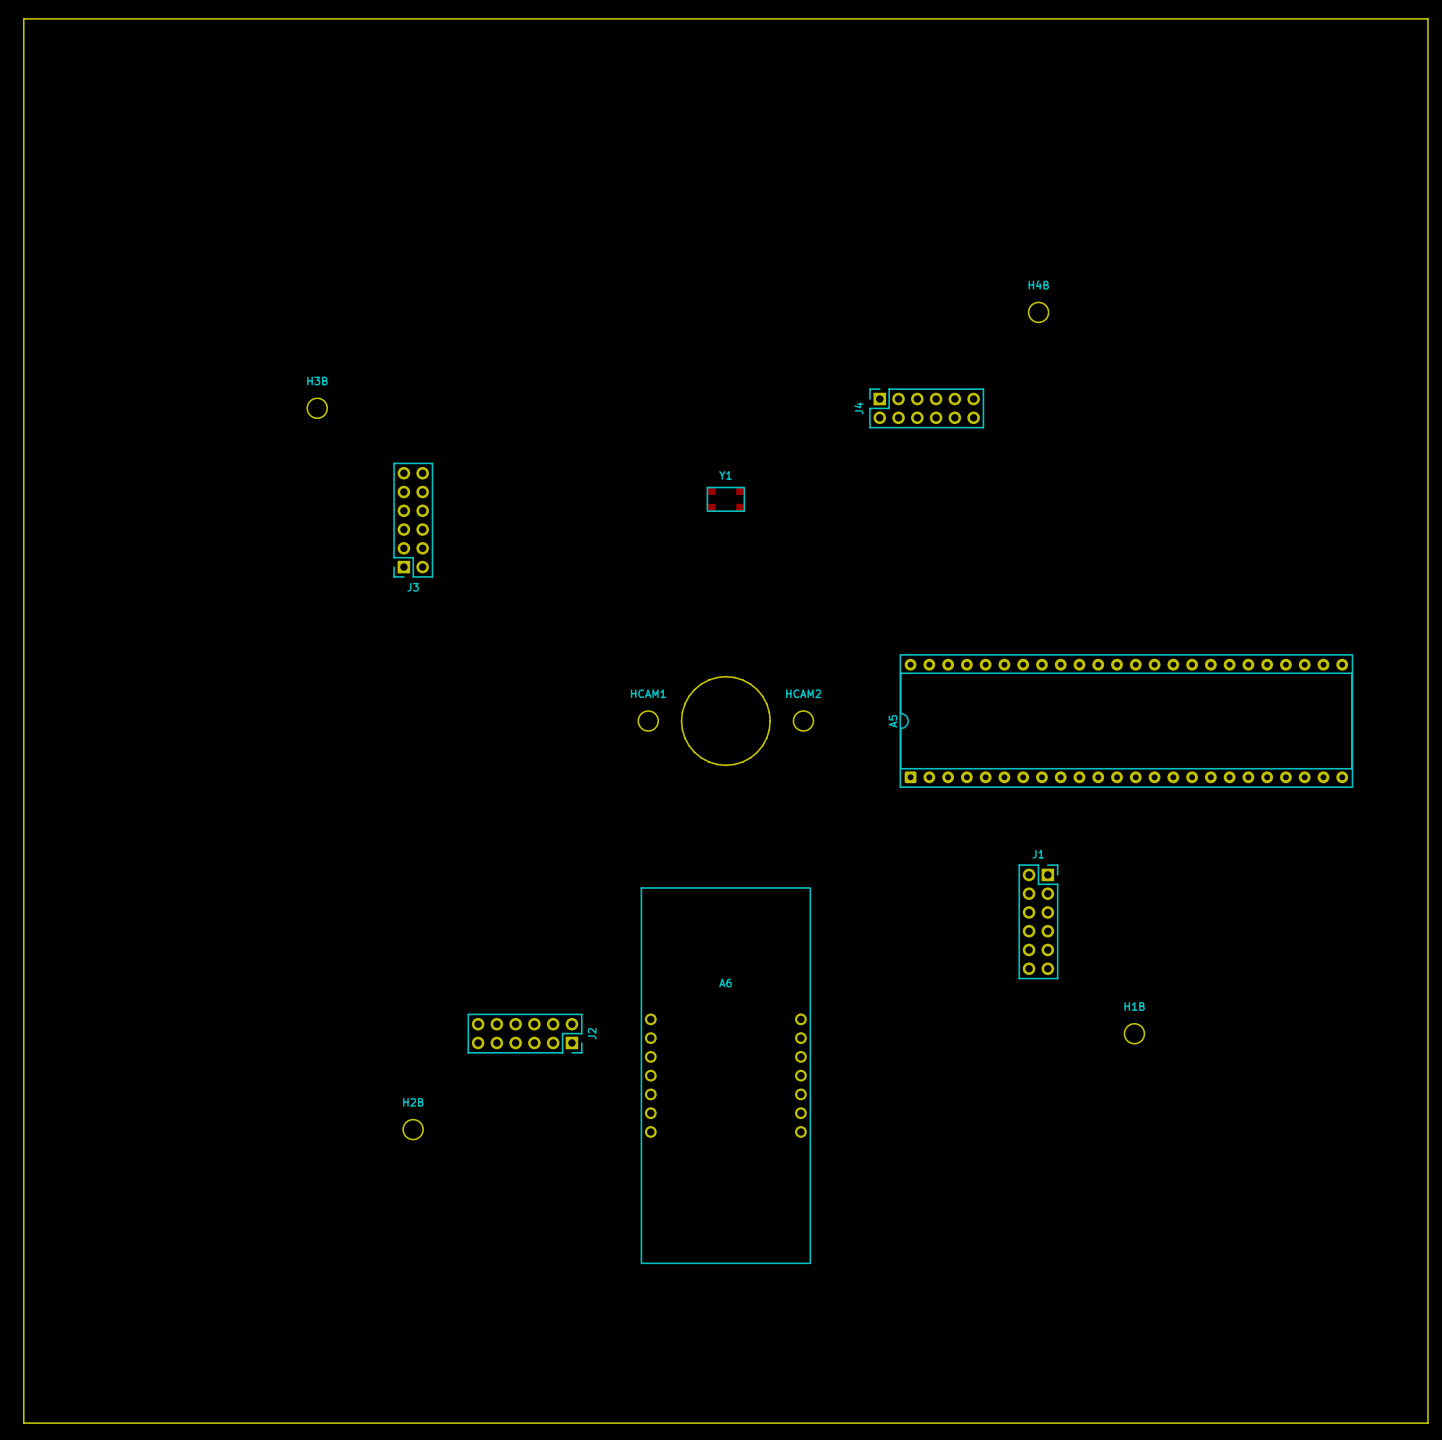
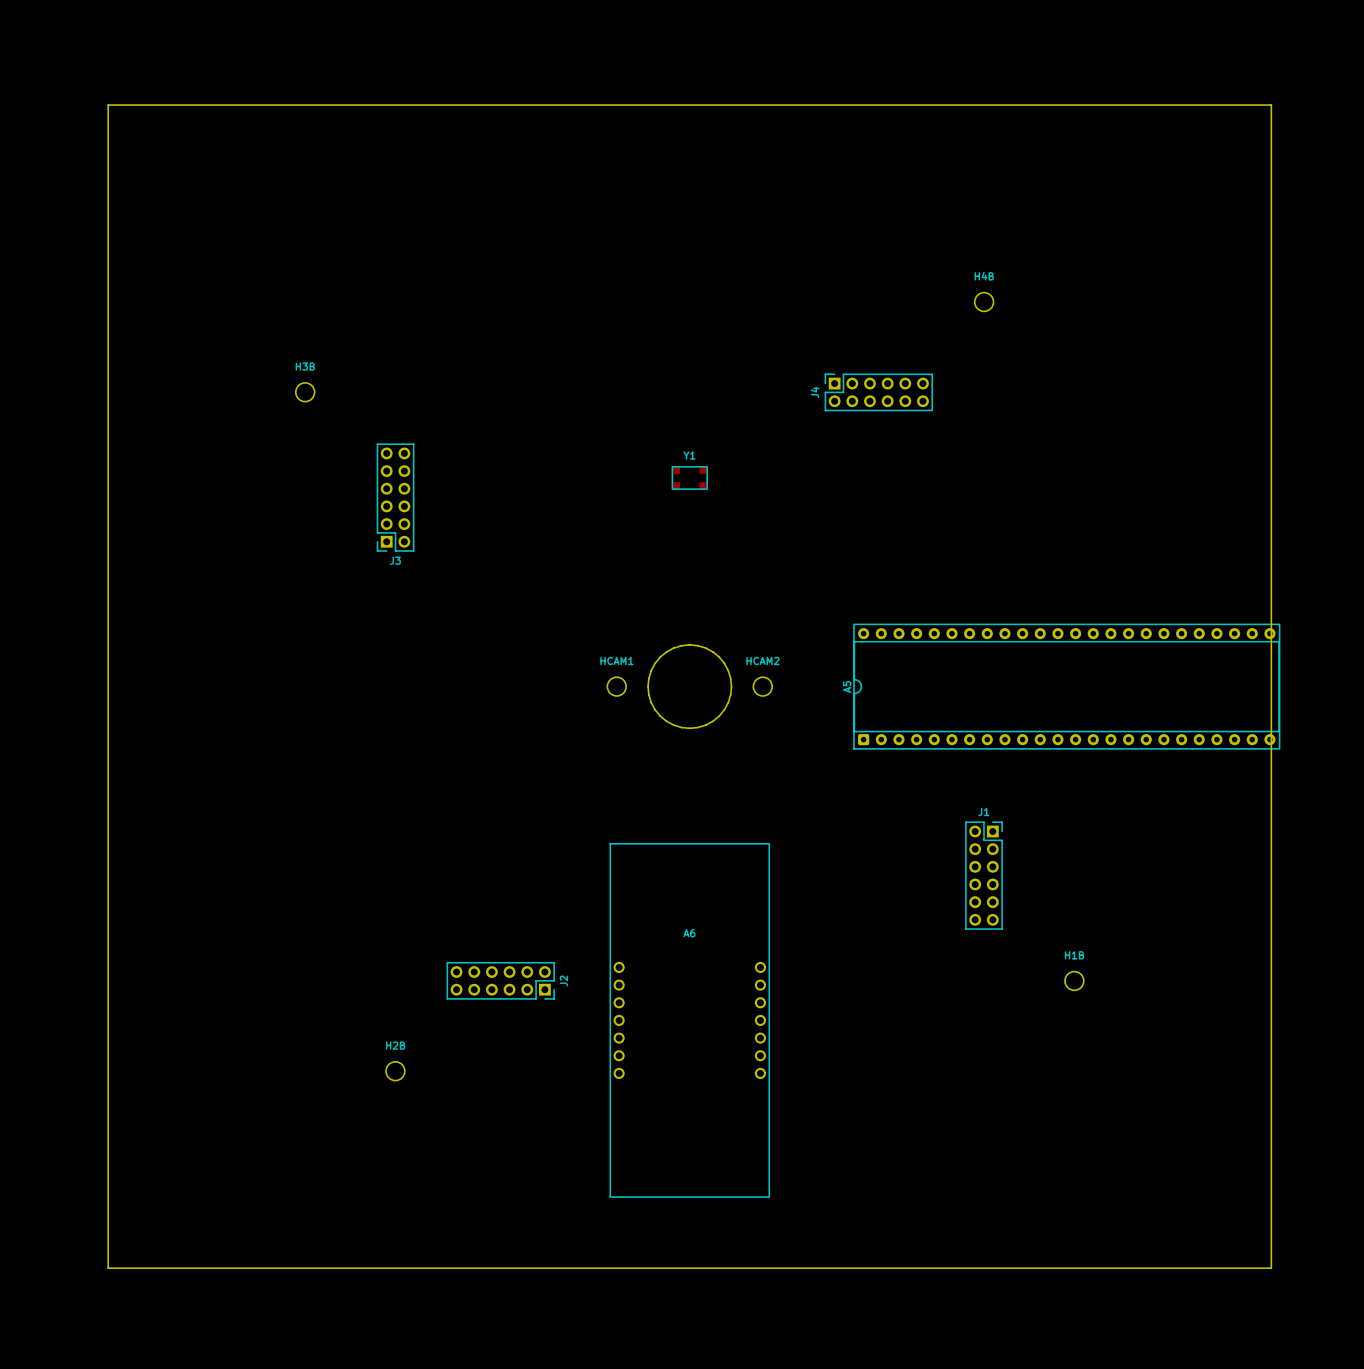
board edge: (23, 18) (1427, 18) (1427, 1423) (23, 1423) (23, 18) -> (108, 105) (108, 1268) (1271, 1268) (1271, 105) (108, 105)

